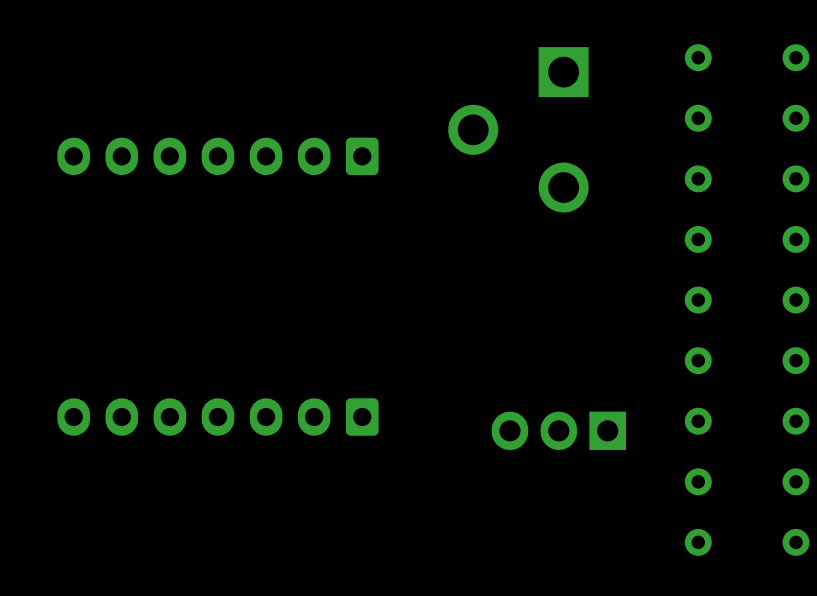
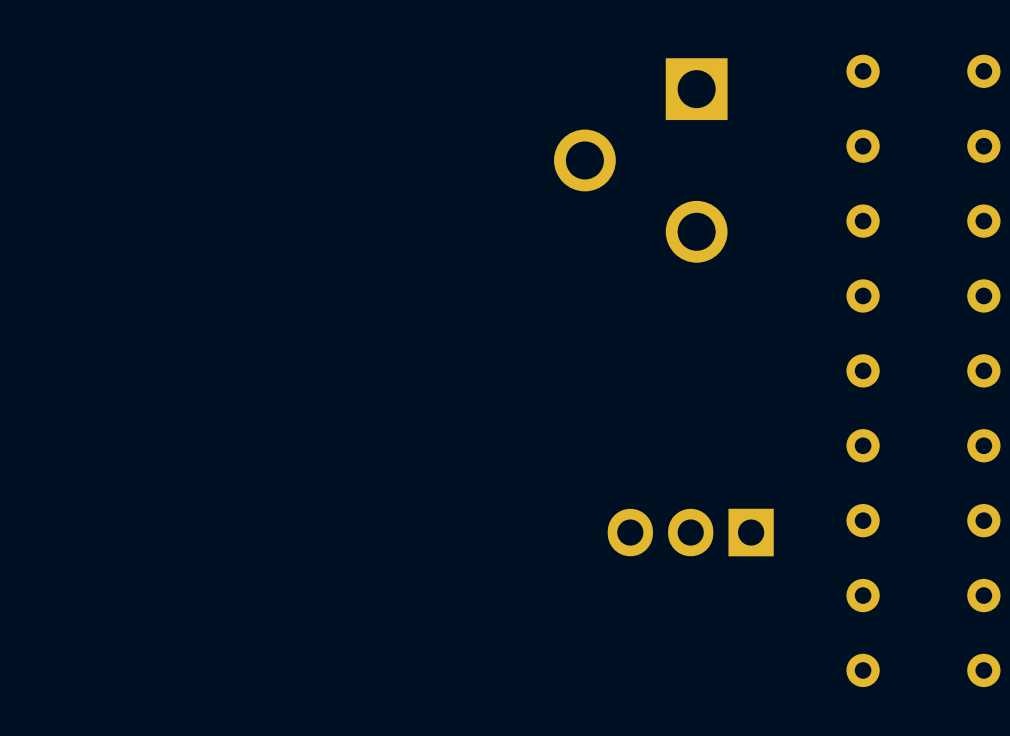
part: (217, 156) -> none
part: (217, 417) -> none

